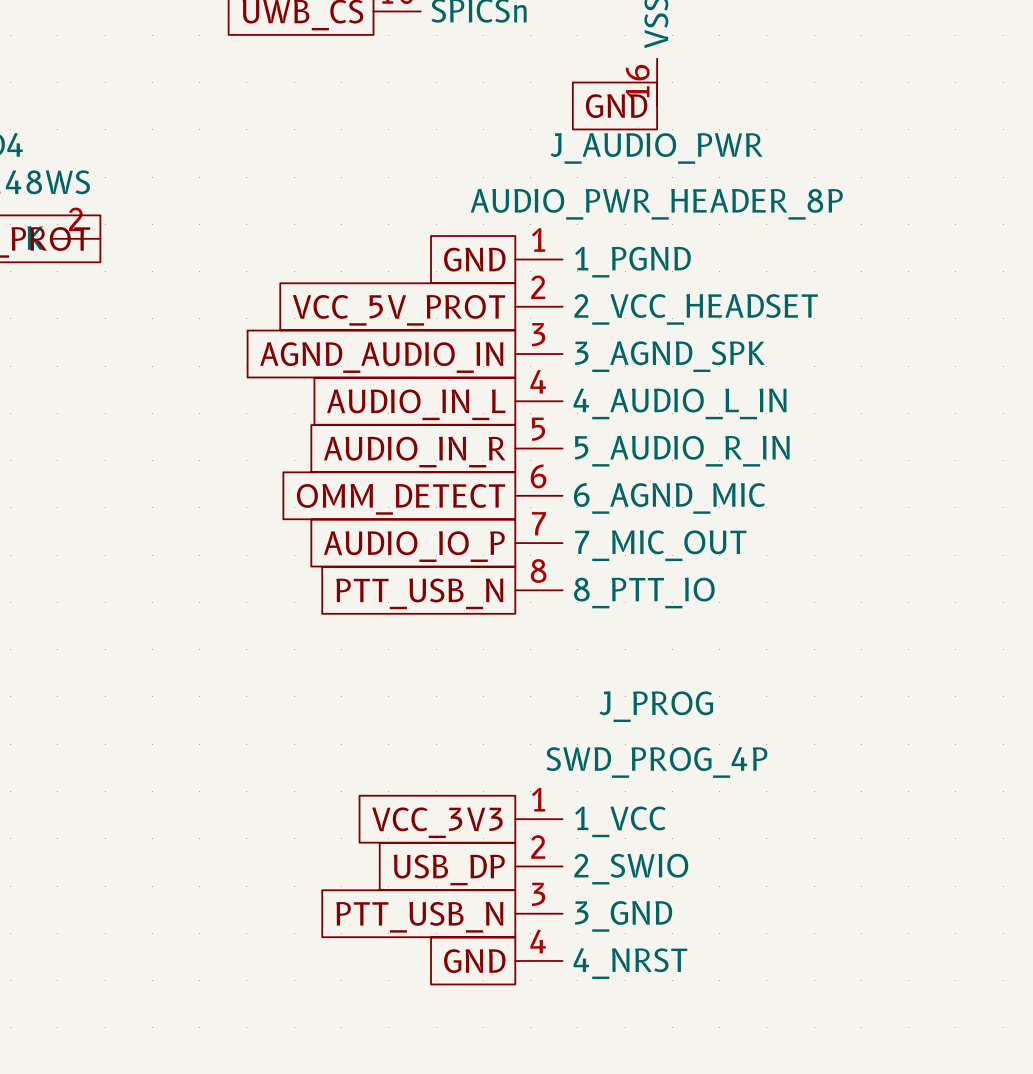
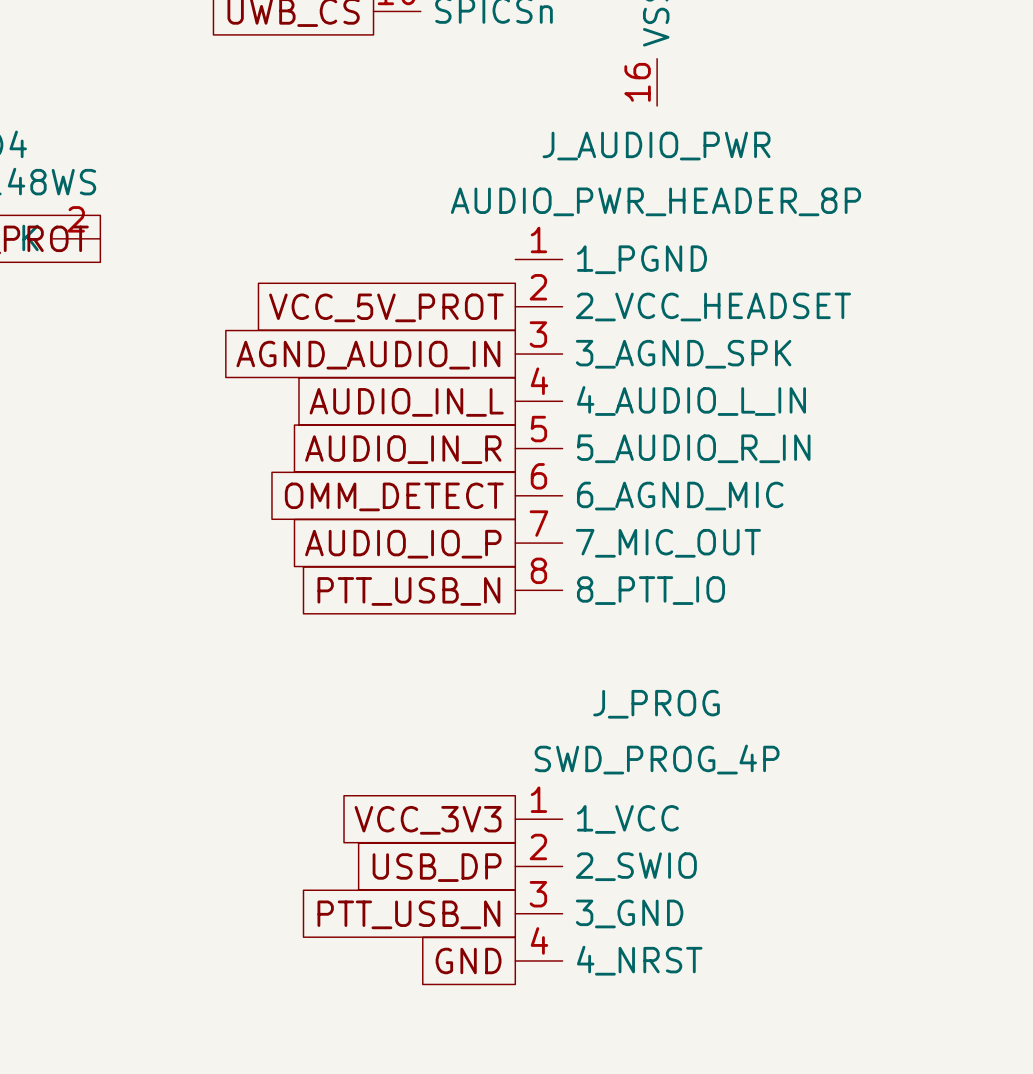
global label: GND (616, 106) -> none
global label: GND (474, 259) -> none

